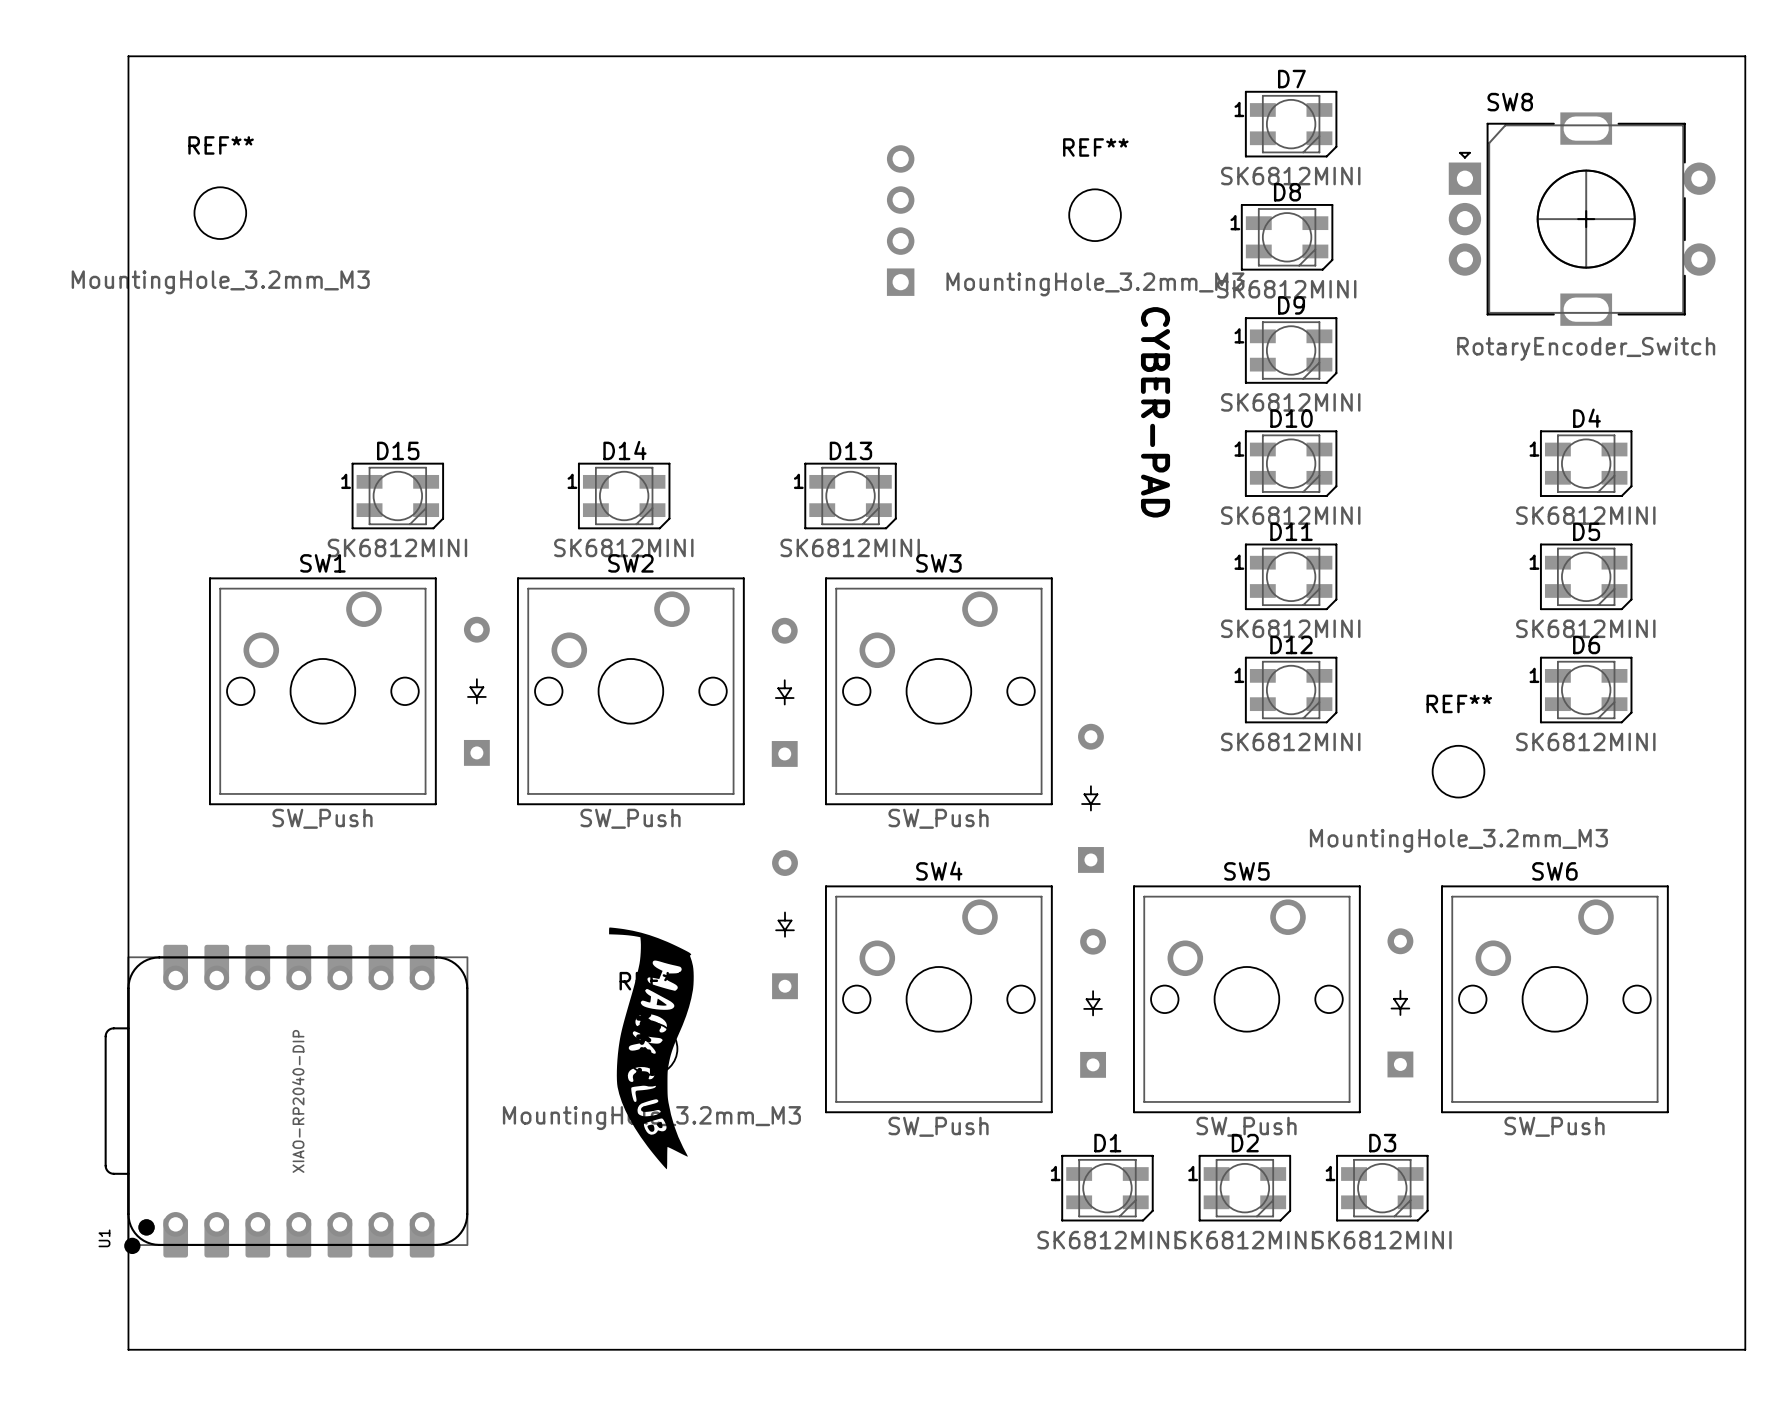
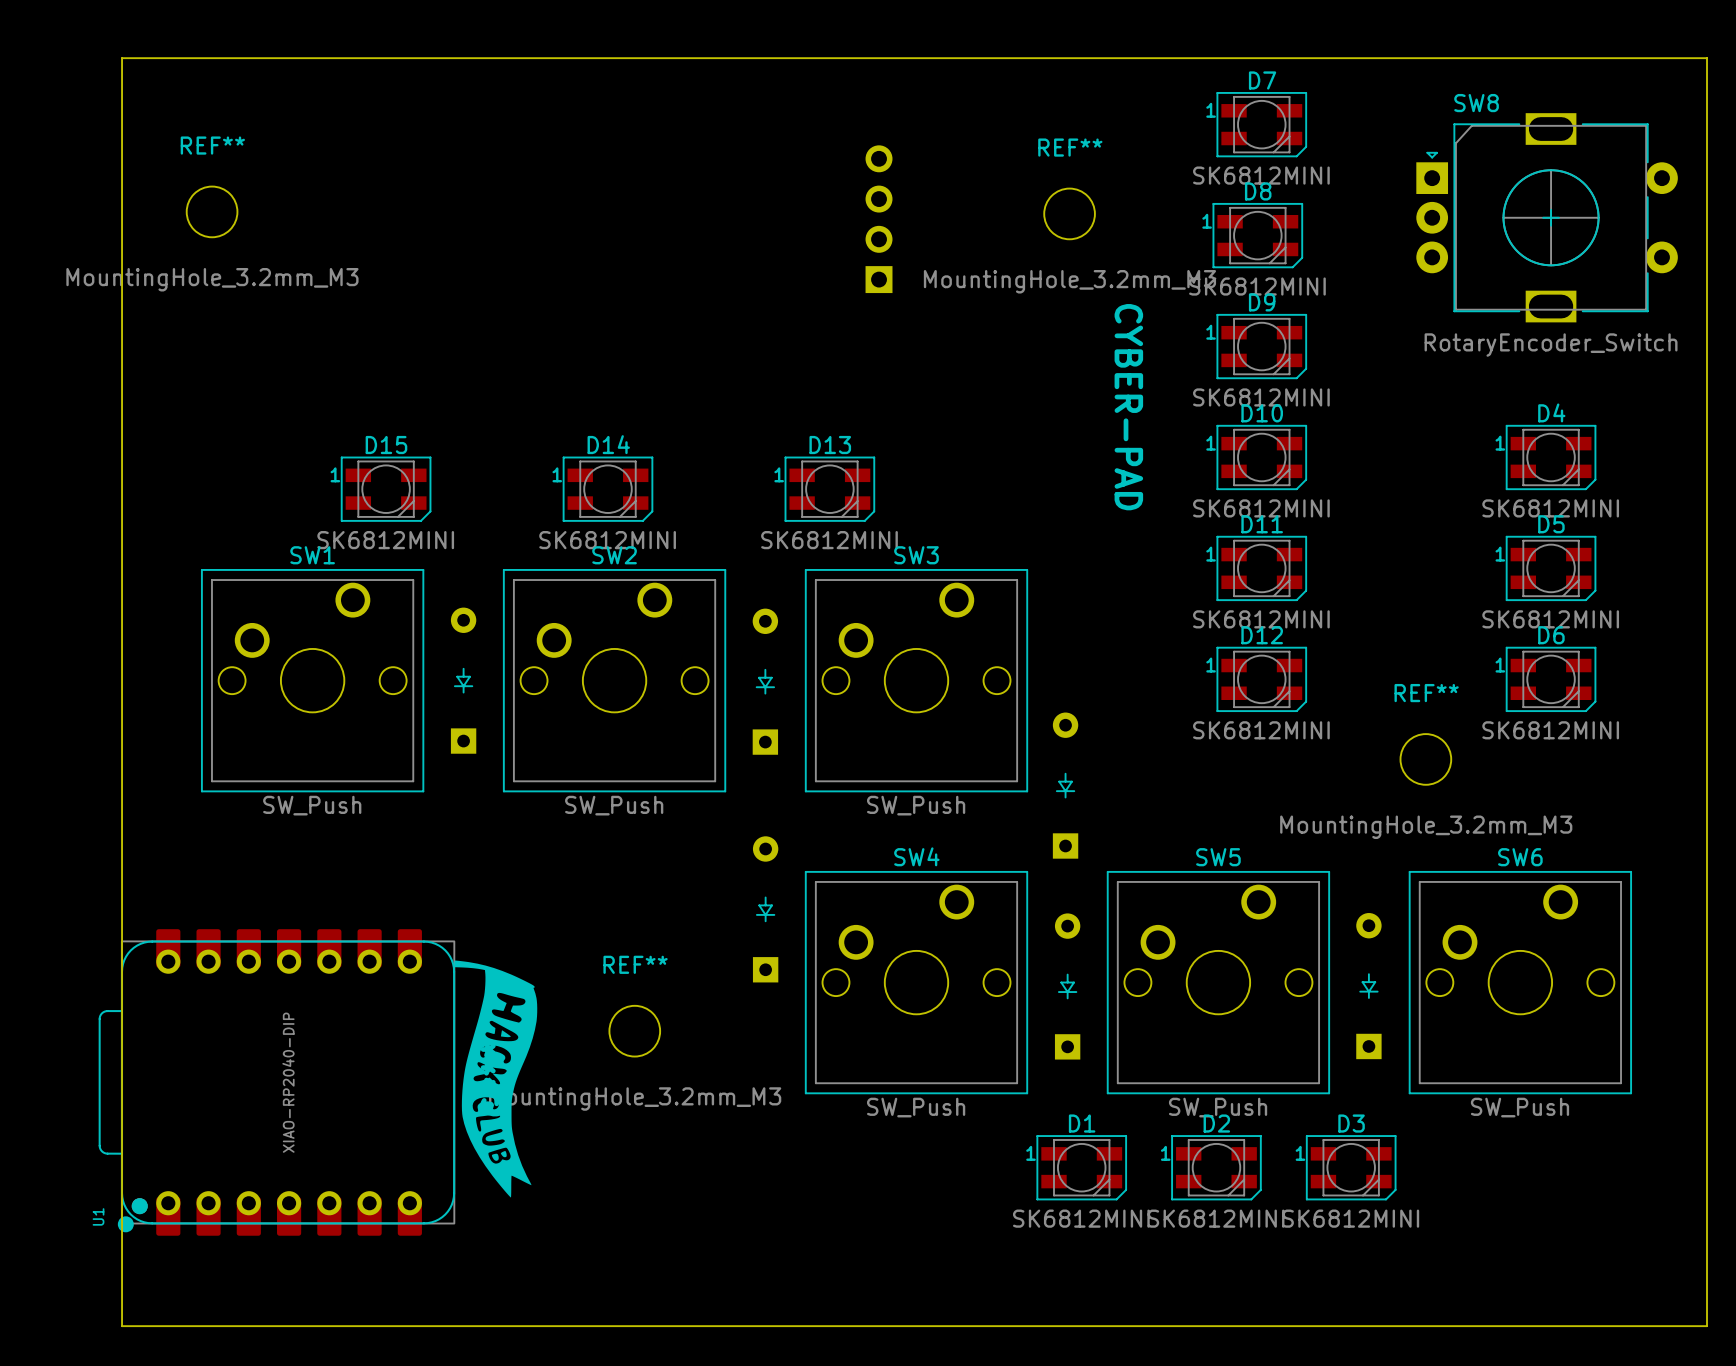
part position: (651, 1048) -> (495, 1079)

